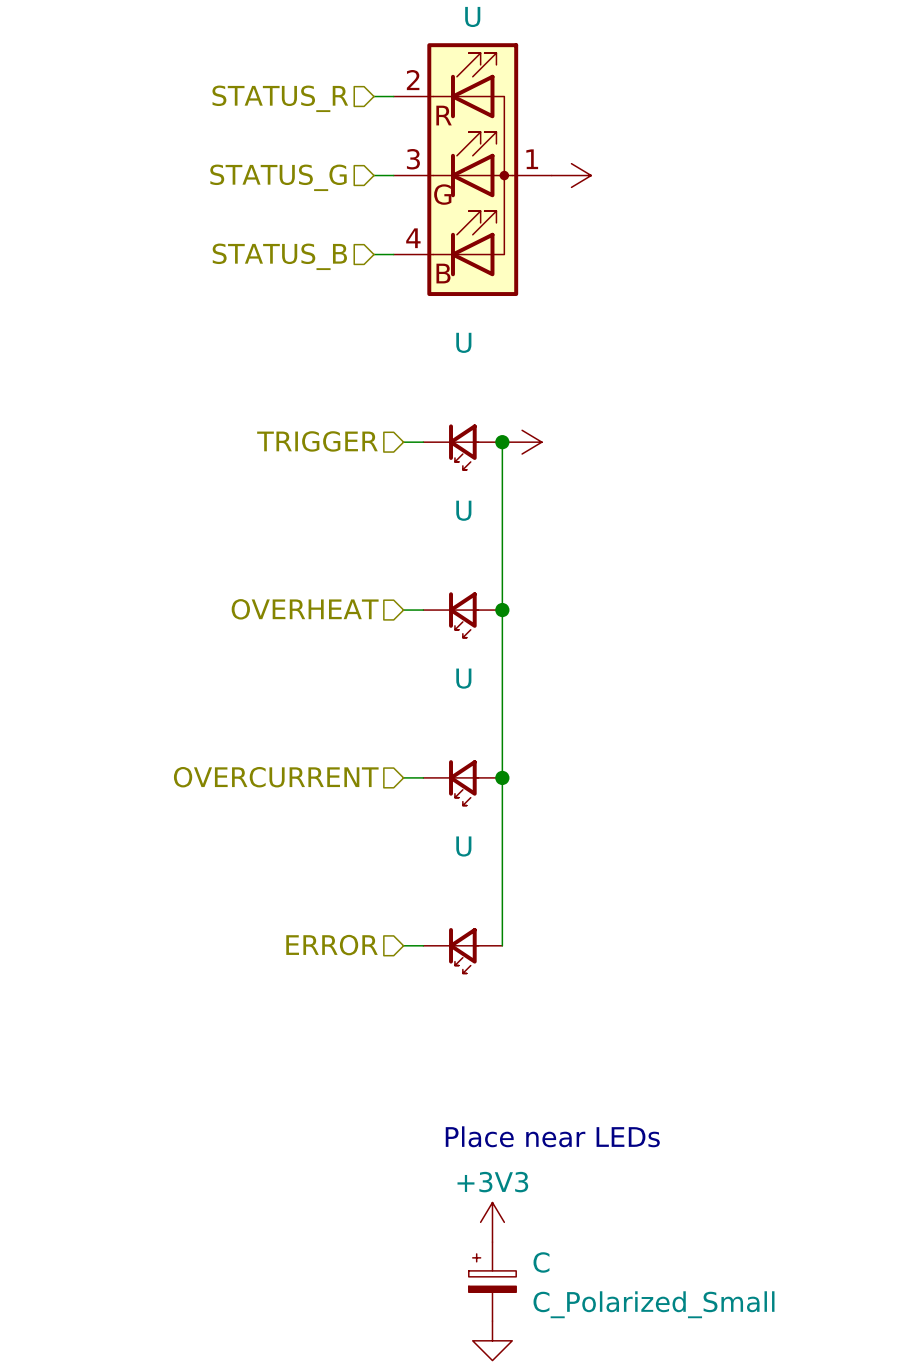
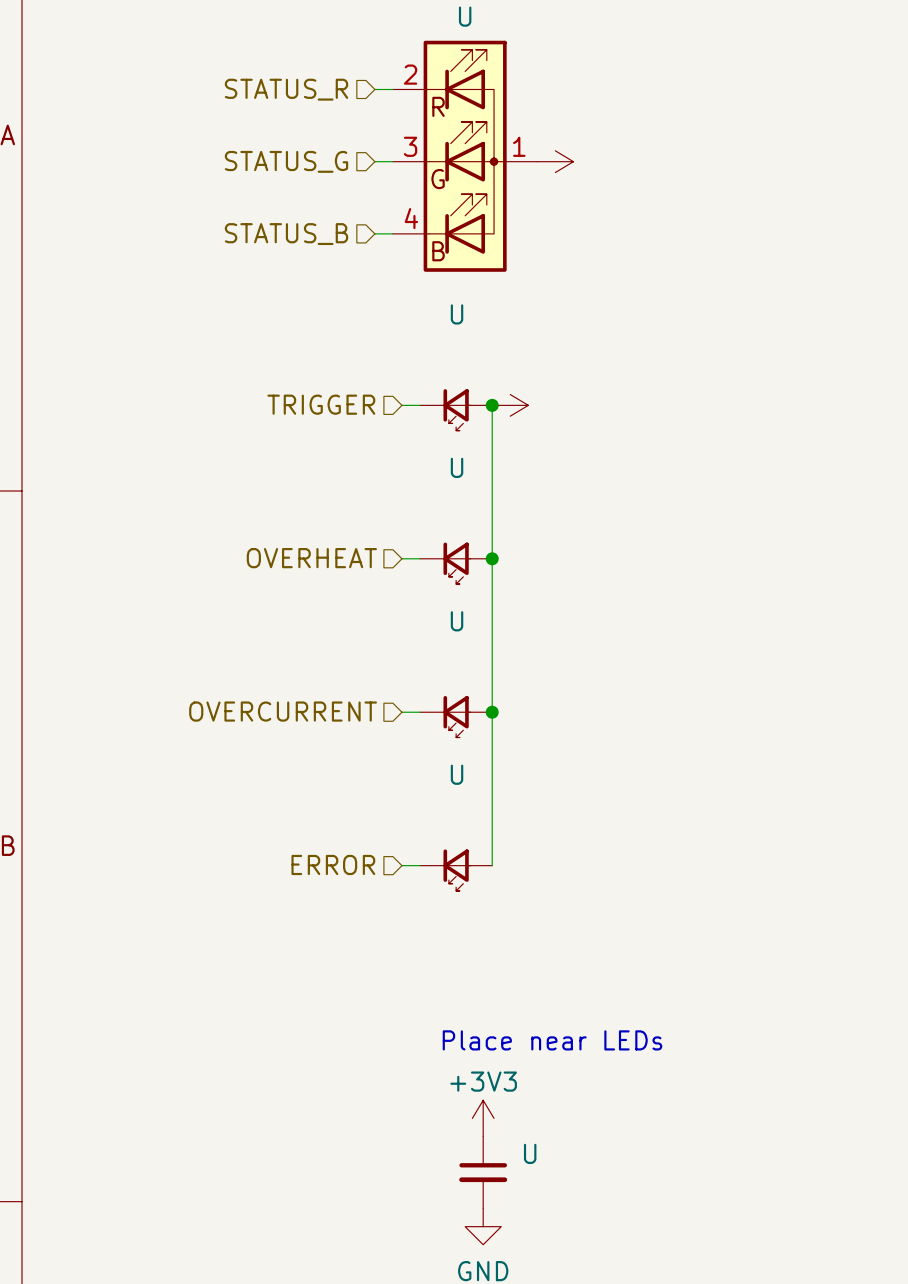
C: C_Polarized_Small (492, 1281) -> none
U: none -> (483, 1172)

